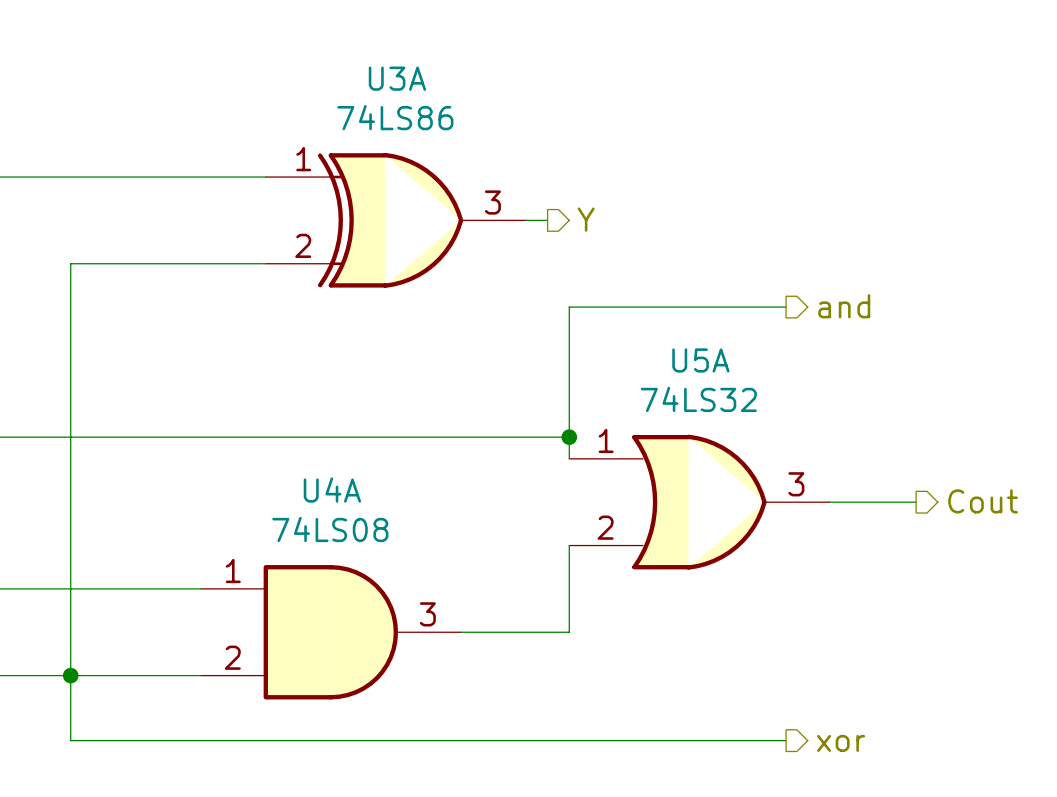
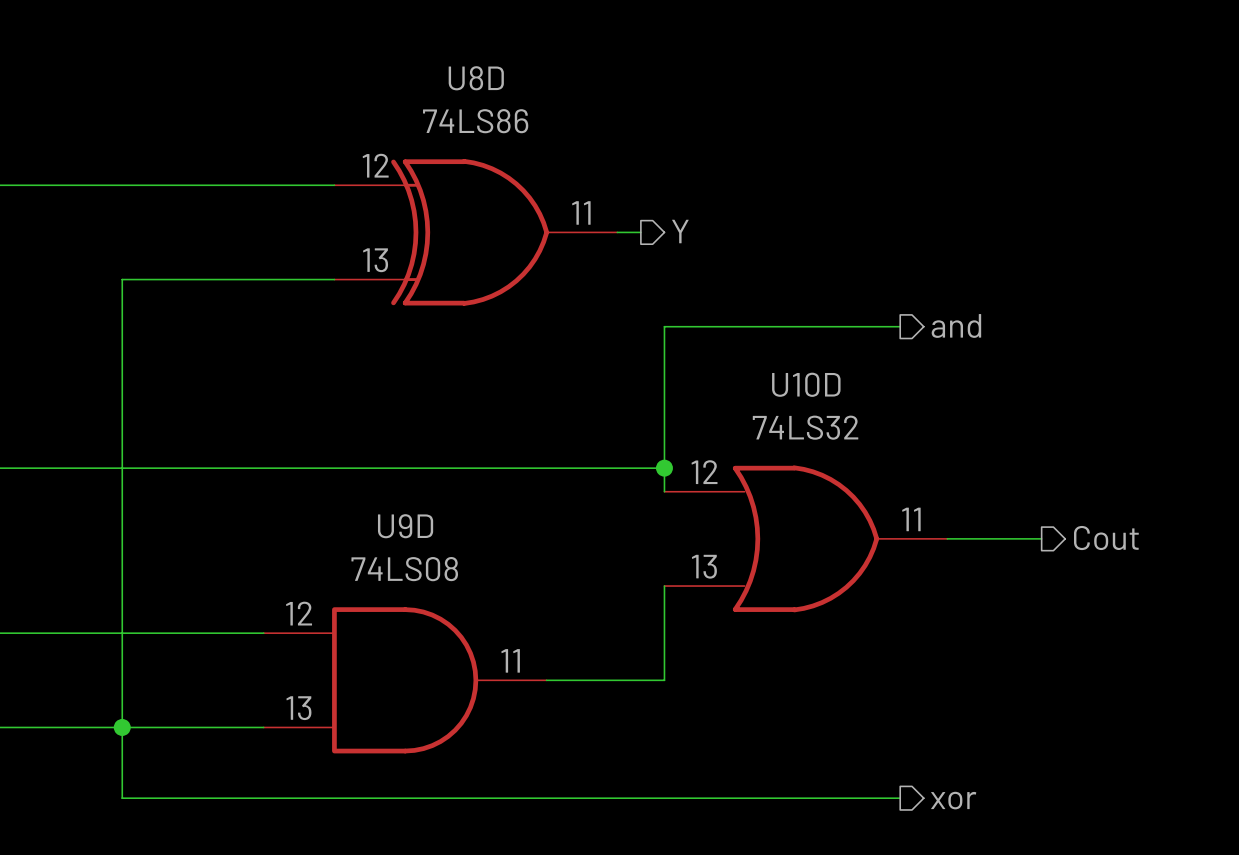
U3A name: U3A (397, 78) -> U8D (476, 78)
U3A pin number: 1 (303, 159) -> 12 (375, 165)
U3A pin number: 3 (492, 202) -> 11 (581, 212)
U3A pin number: 2 (303, 245) -> 13 (375, 260)
U5A name: U5A (700, 360) -> U10D (806, 384)
U5A pin number: 1 (606, 440) -> 12 (704, 472)
U5A pin number: 3 (796, 484) -> 11 (911, 519)
U4A name: U4A (332, 490) -> U9D (405, 526)
U5A pin number: 2 (605, 527) -> 13 (704, 566)
U4A pin number: 1 (233, 571) -> 12 (299, 613)
U4A pin number: 3 (427, 614) -> 11 (510, 660)
U4A pin number: 2 (232, 657) -> 13 (298, 708)

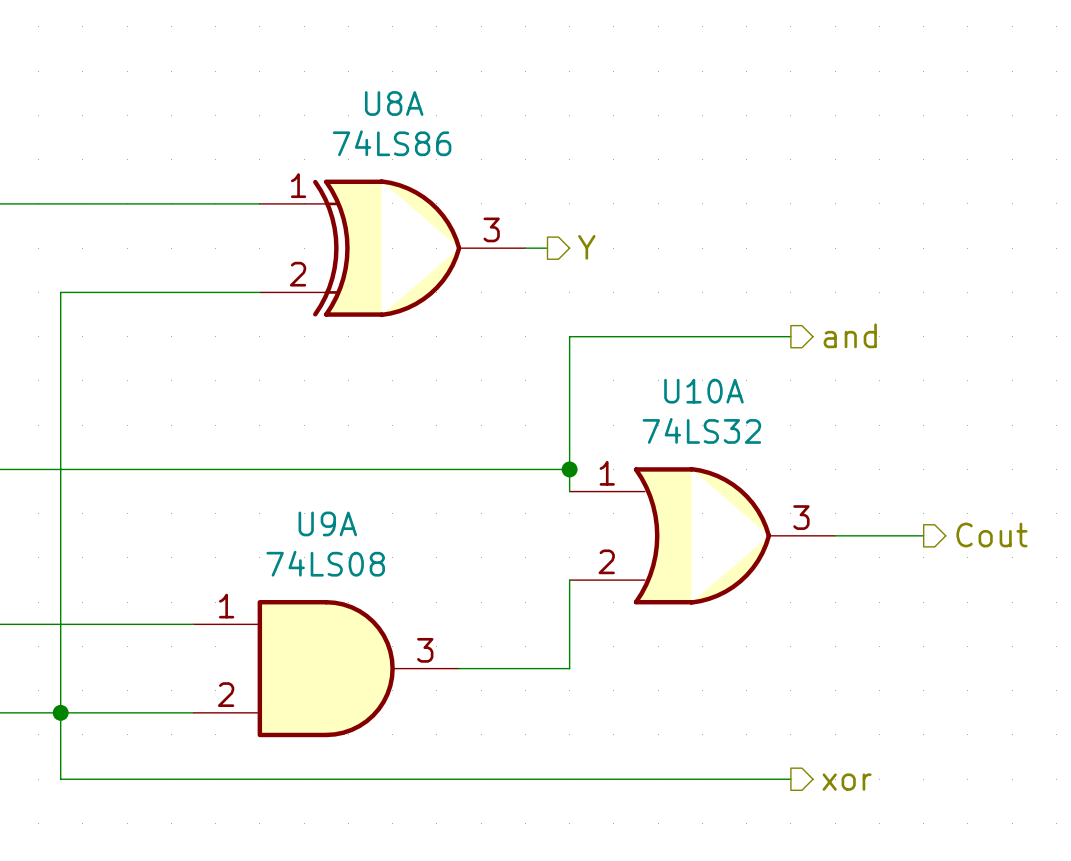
U8D name: U8D (476, 78) -> U8A (394, 103)
U8D pin number: 12 (375, 165) -> 1 (298, 185)
U8D pin number: 11 (581, 212) -> 3 (491, 229)
U8D pin number: 13 (375, 260) -> 2 (298, 274)
U10D name: U10D (806, 384) -> U10A (703, 391)
U10D pin number: 12 (704, 472) -> 1 (607, 473)
U10D pin number: 11 (911, 519) -> 3 (801, 517)
U9D name: U9D (405, 526) -> U9A (327, 523)
U10D pin number: 13 (704, 566) -> 2 (606, 561)
U9D pin number: 12 (299, 613) -> 1 (226, 606)
U9D pin number: 11 (510, 660) -> 3 (425, 650)
U9D pin number: 13 (298, 708) -> 2 (226, 694)

